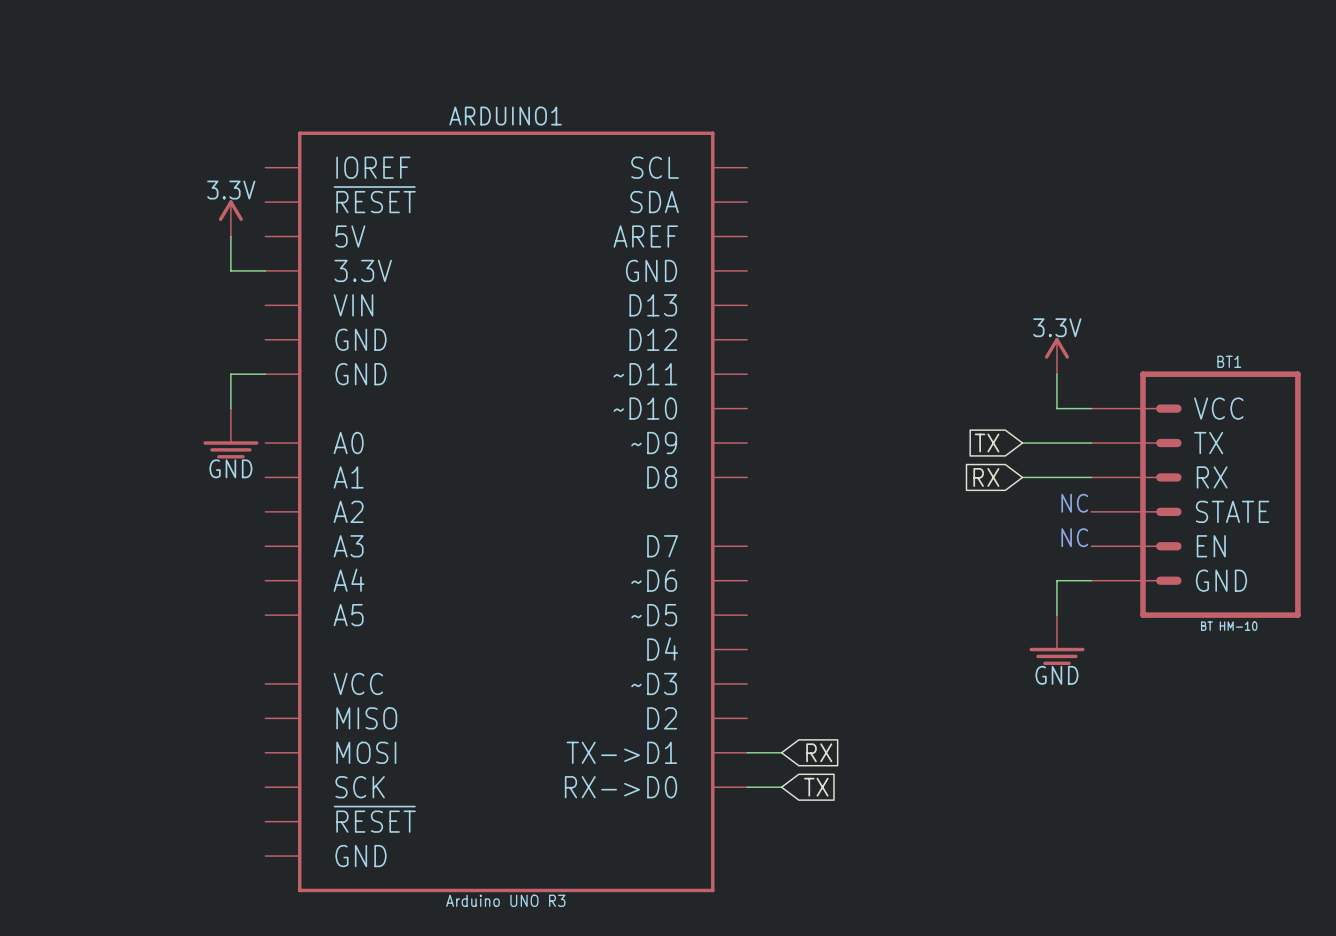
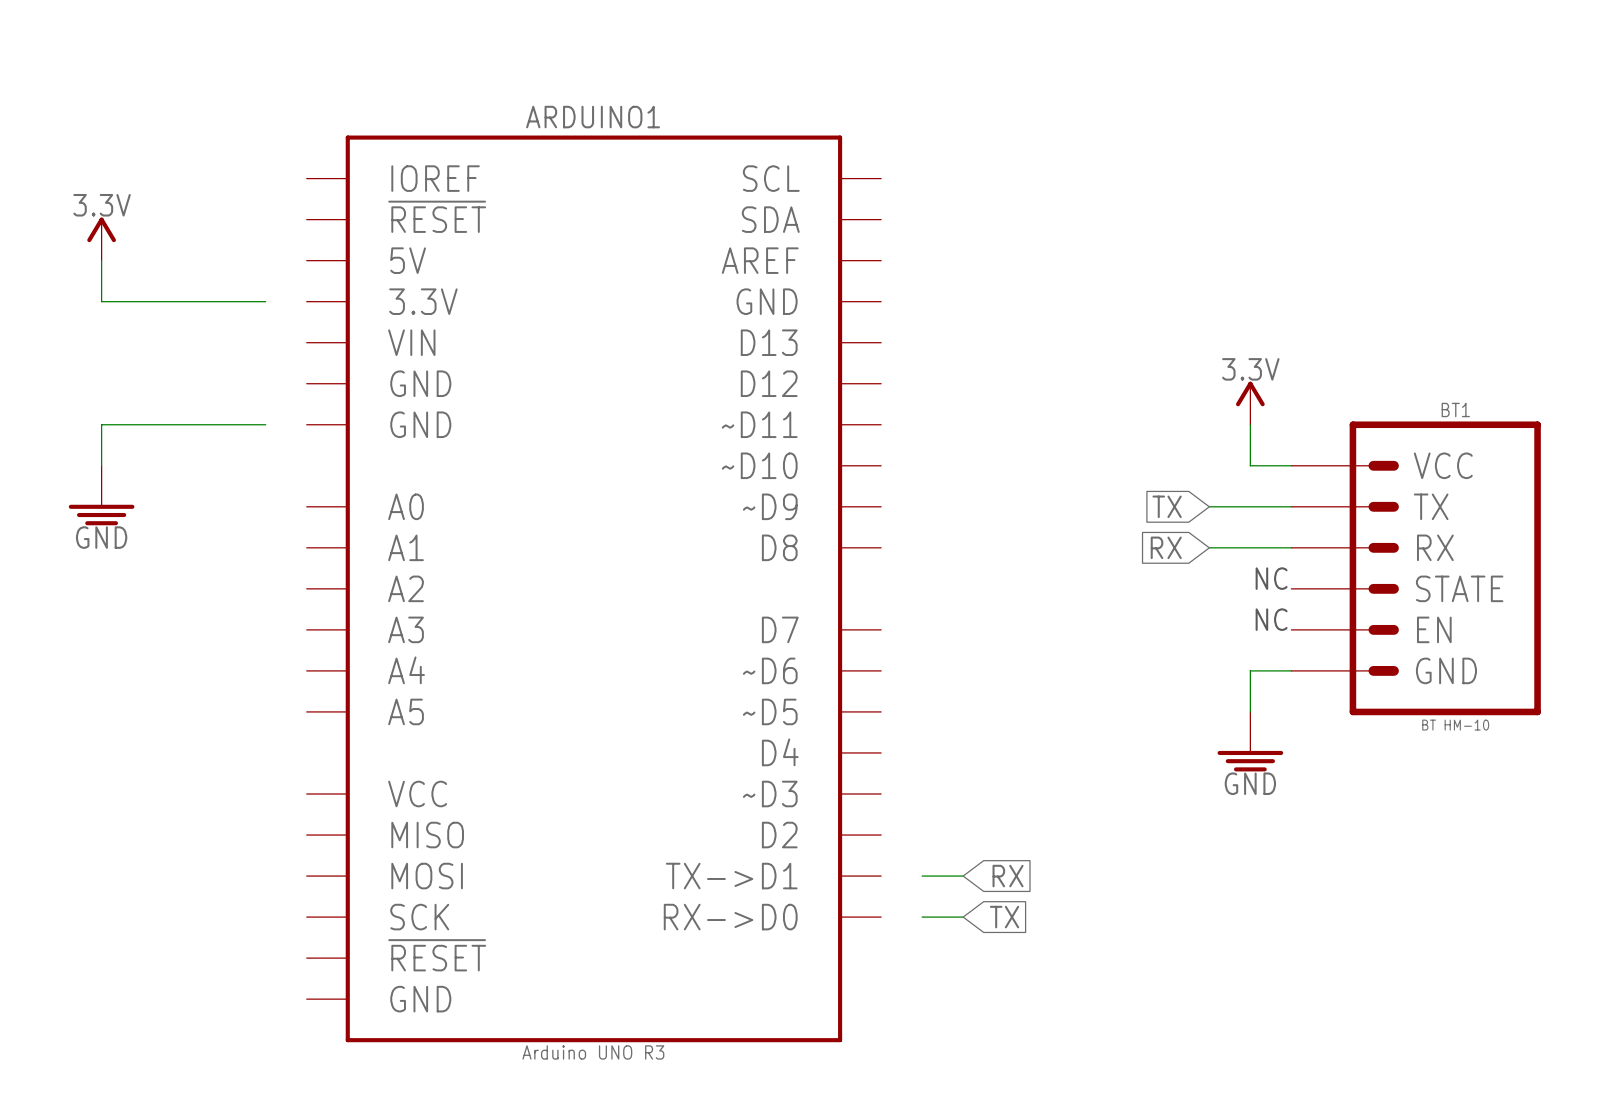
power symbol position: (230, 218) -> (101, 239)
wire: none -> (101, 260) (101, 301) (265, 301)
wire: (230, 236) (230, 270) (265, 270) -> none
wire: none -> (265, 424) (101, 424) (101, 465)
wire: (265, 374) (230, 374) (230, 408) -> none
power symbol position: (230, 433) -> (101, 495)
wire: (747, 752) (781, 752) -> (963, 876) (922, 876)
global label position: RX (819, 752) -> RX (1008, 876)
wire: (747, 787) (781, 787) -> (963, 917) (922, 917)
global label position: TX (816, 787) -> TX (1004, 917)

